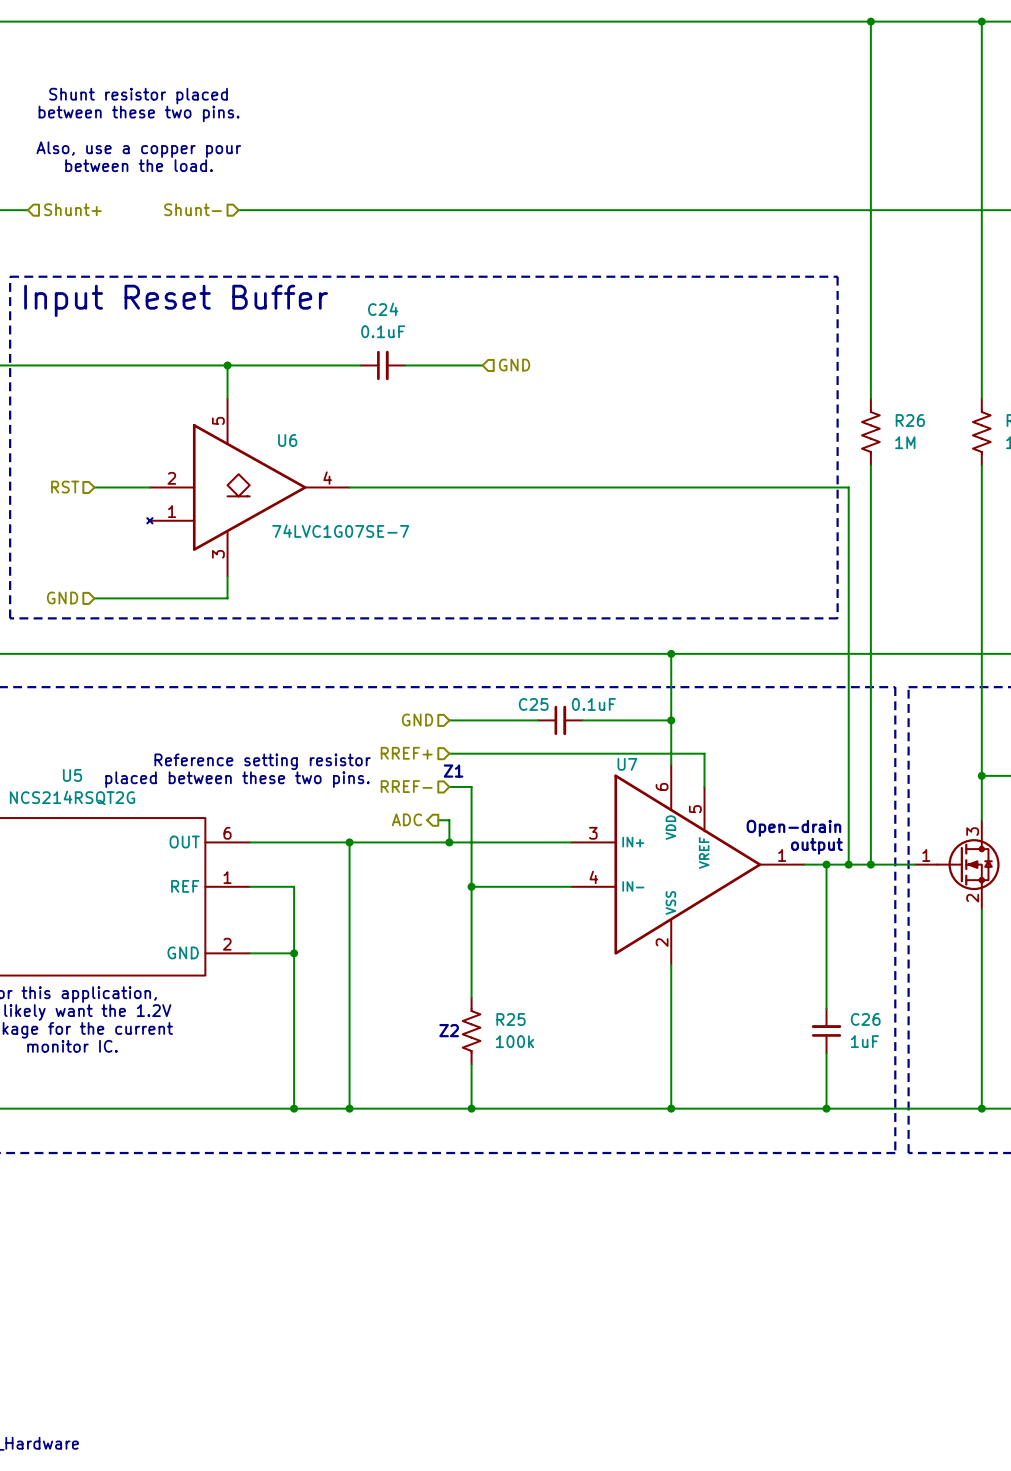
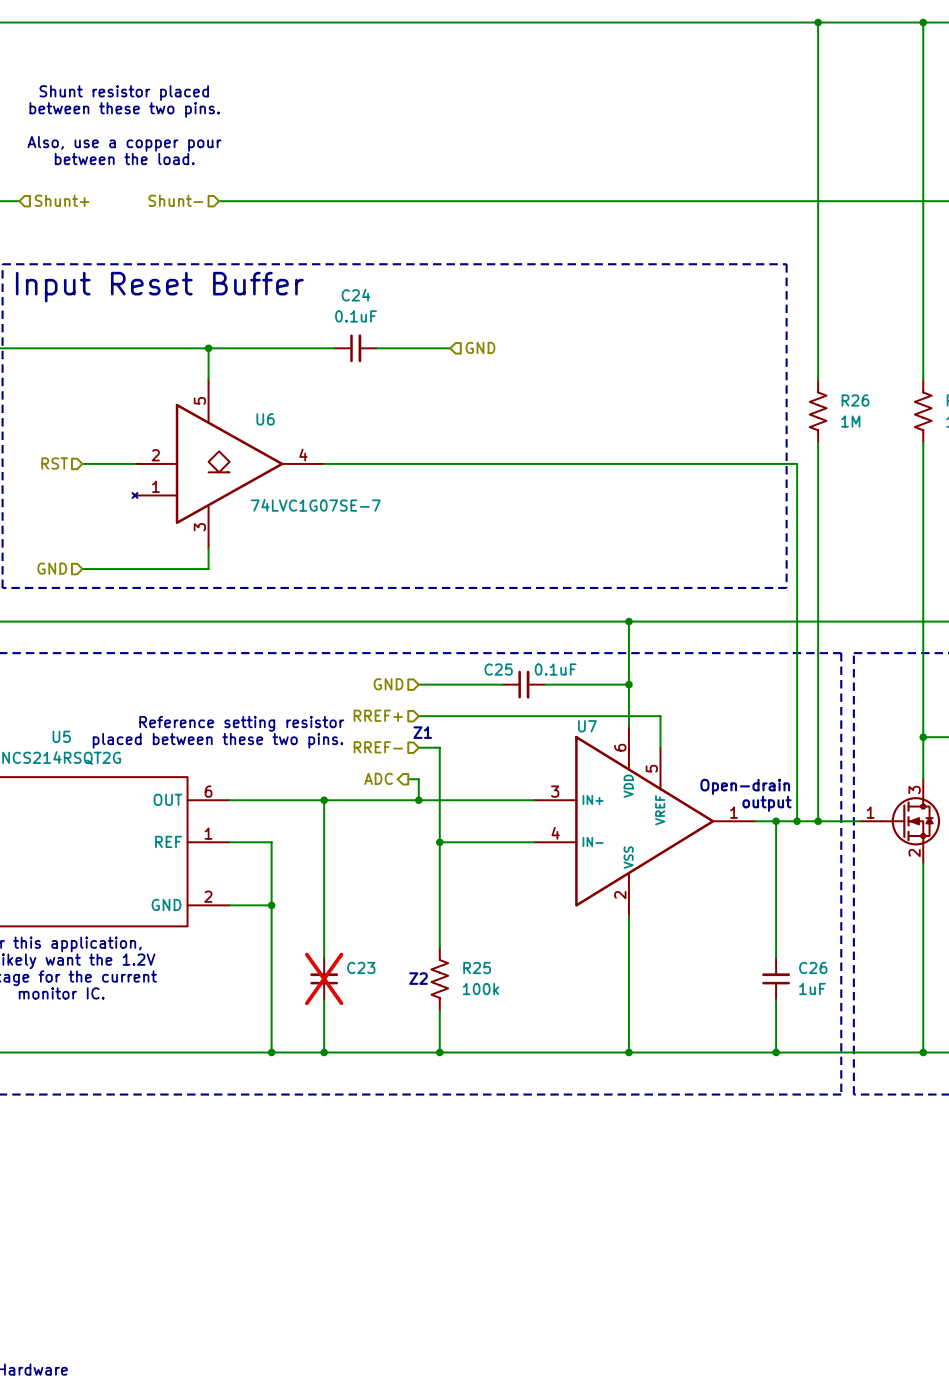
C23: none -> (324, 978)

